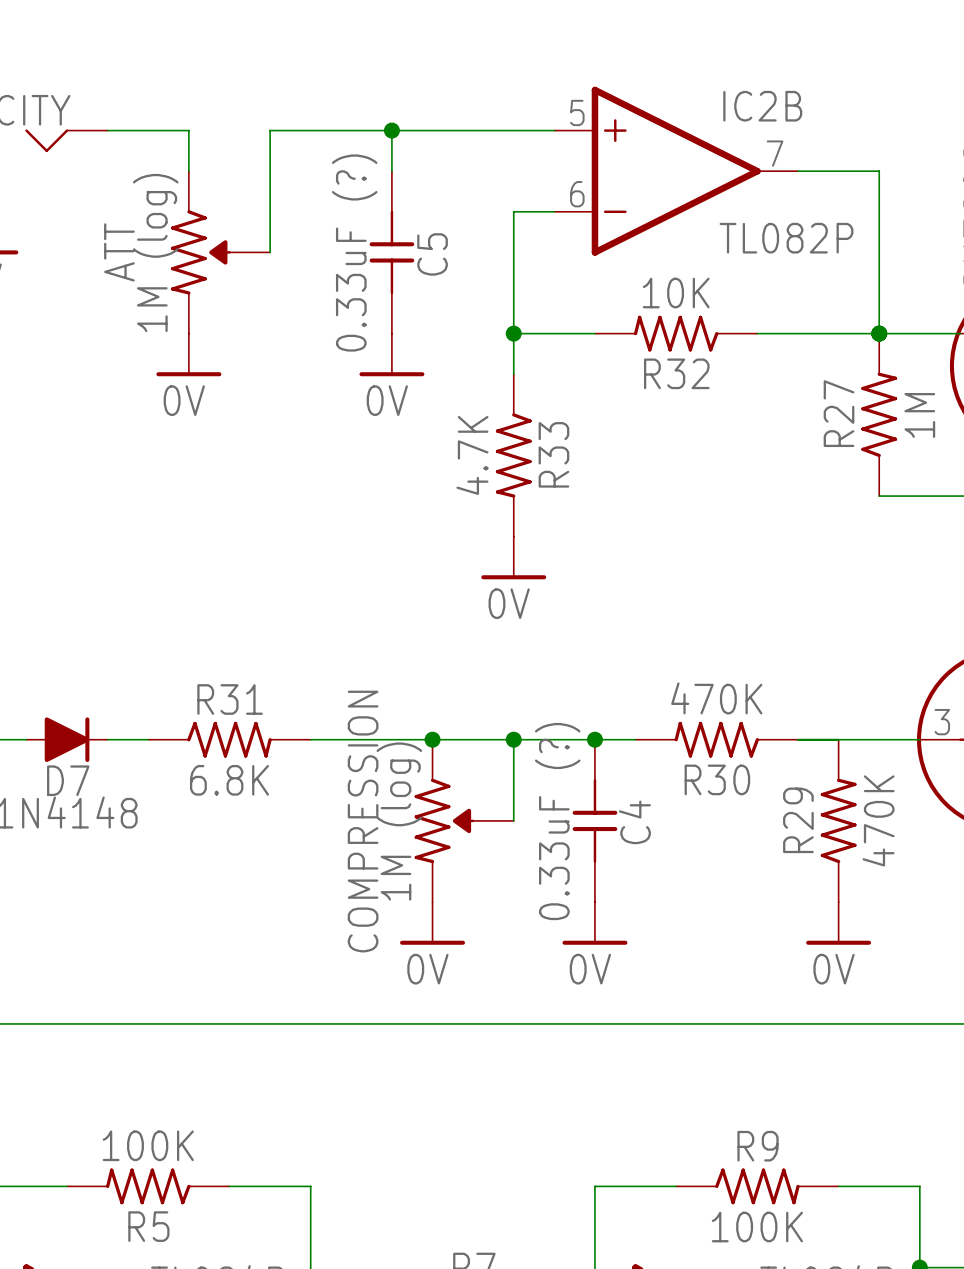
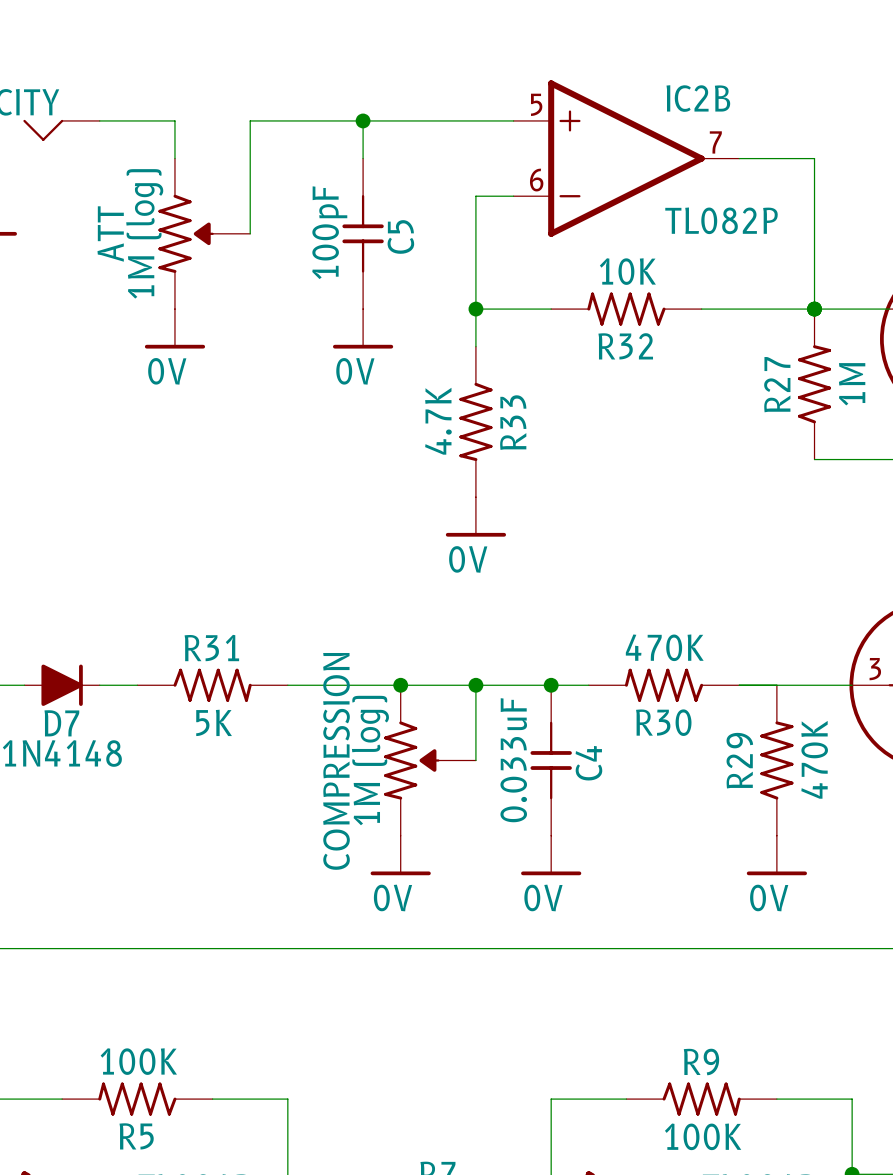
C5 value: 0.33uF (?) (354, 253) -> 100pF (329, 232)
R31 value: 6.8K (229, 780) -> 5K (214, 722)
C4 value: 0.33uF (?) (557, 821) -> 0.033uF (513, 760)

